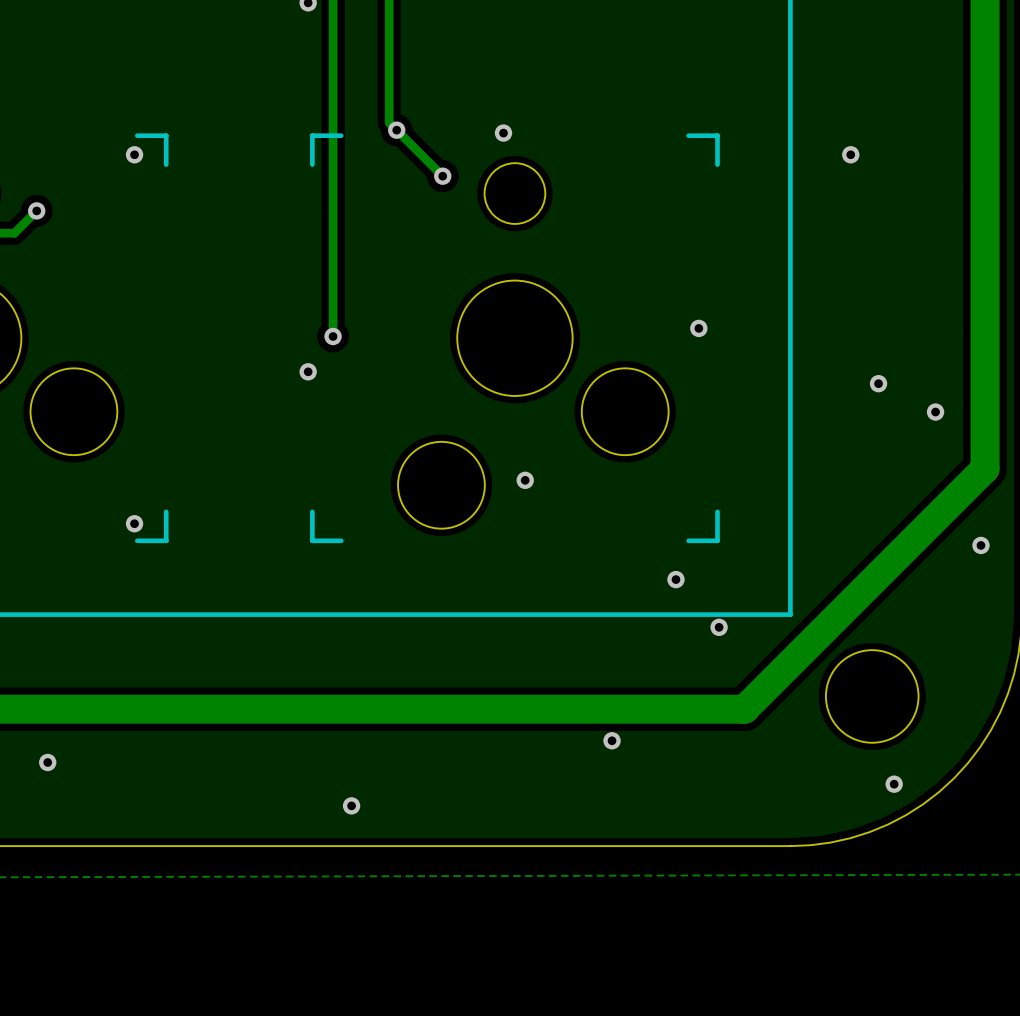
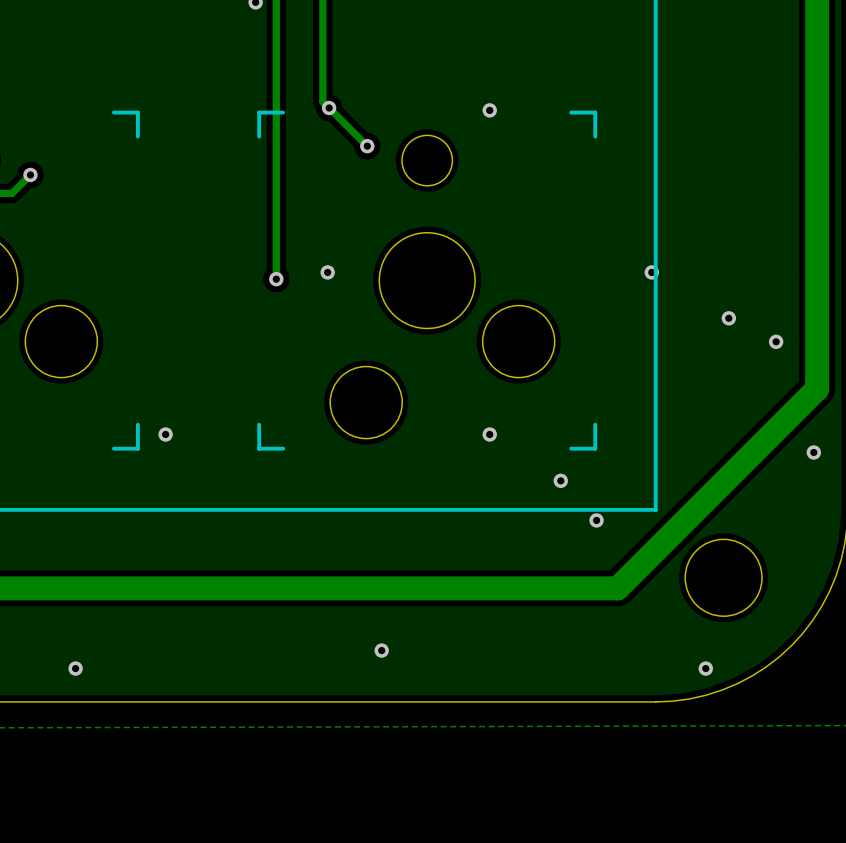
via position: (503, 133) -> (489, 110)
via: (134, 154) -> none
via: (850, 154) -> none
via: none -> (327, 272)
via position: (698, 328) -> (651, 272)
via: (308, 371) -> none
via position: (525, 480) -> (489, 434)
via position: (134, 523) -> (165, 434)
via: (612, 740) -> none
via position: (47, 762) -> (75, 668)
via: none -> (381, 650)
via position: (894, 784) -> (705, 668)
via: (351, 805) -> none

